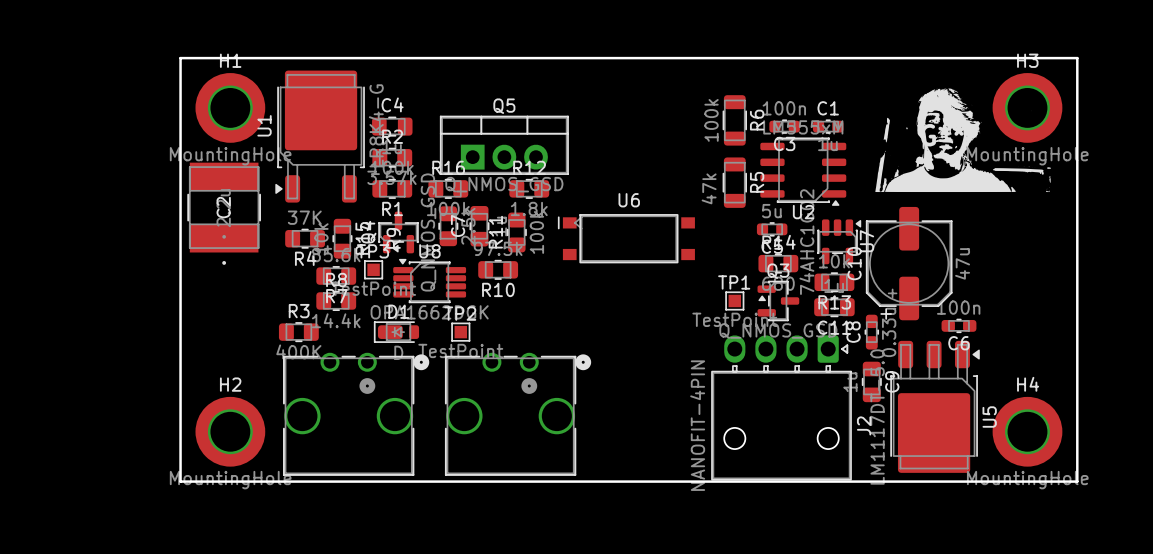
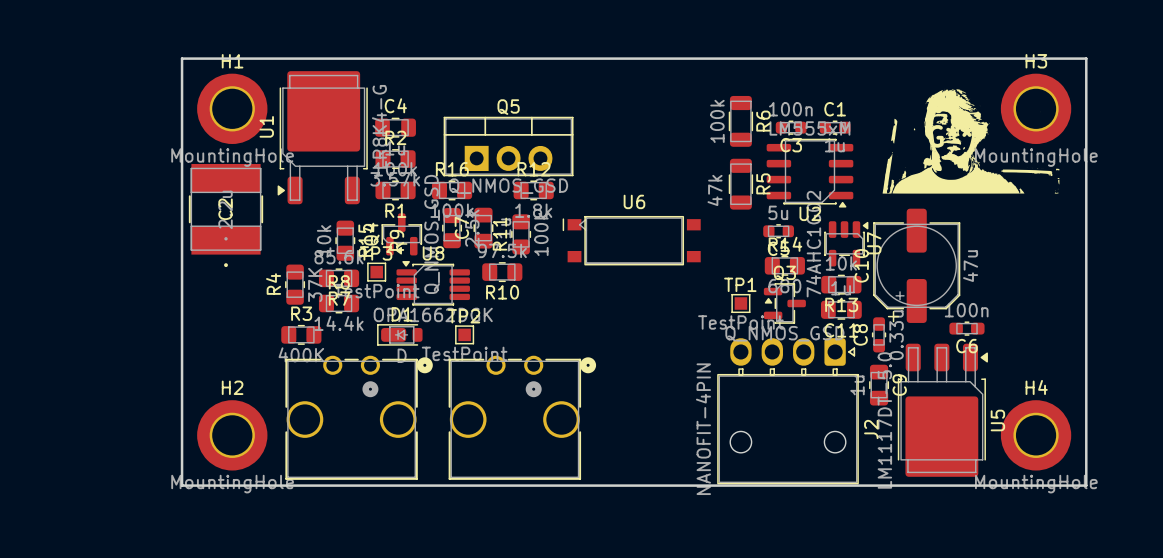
R4 rotation: 0° (305, 238) -> 90° clockwise (295, 284)
R4 position: (305, 238) -> (295, 284)

